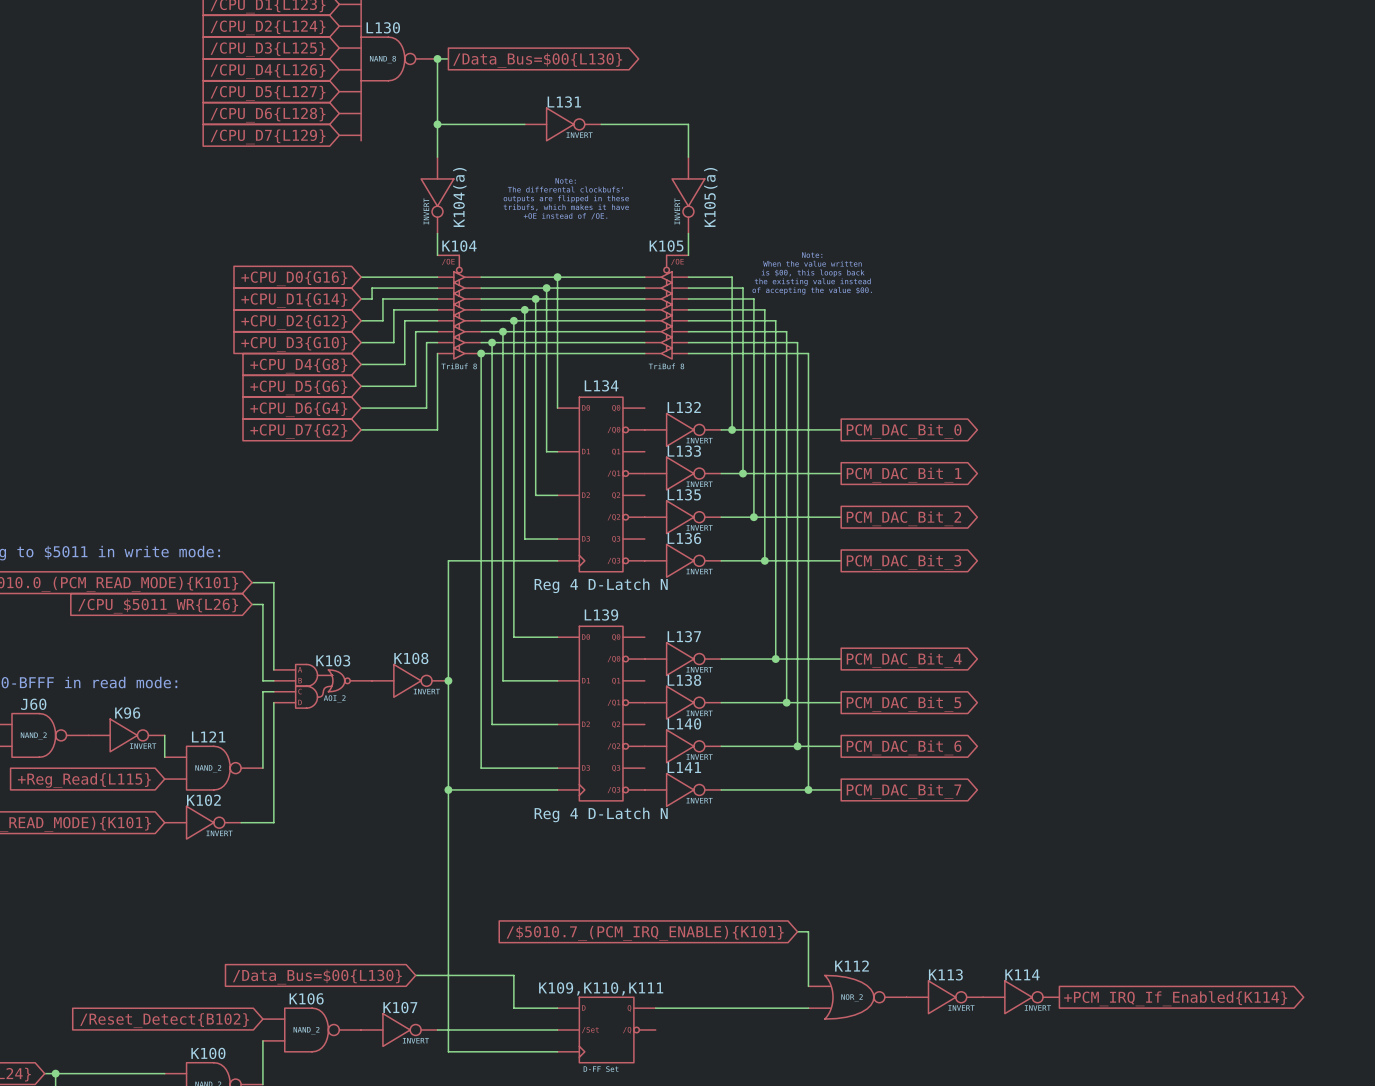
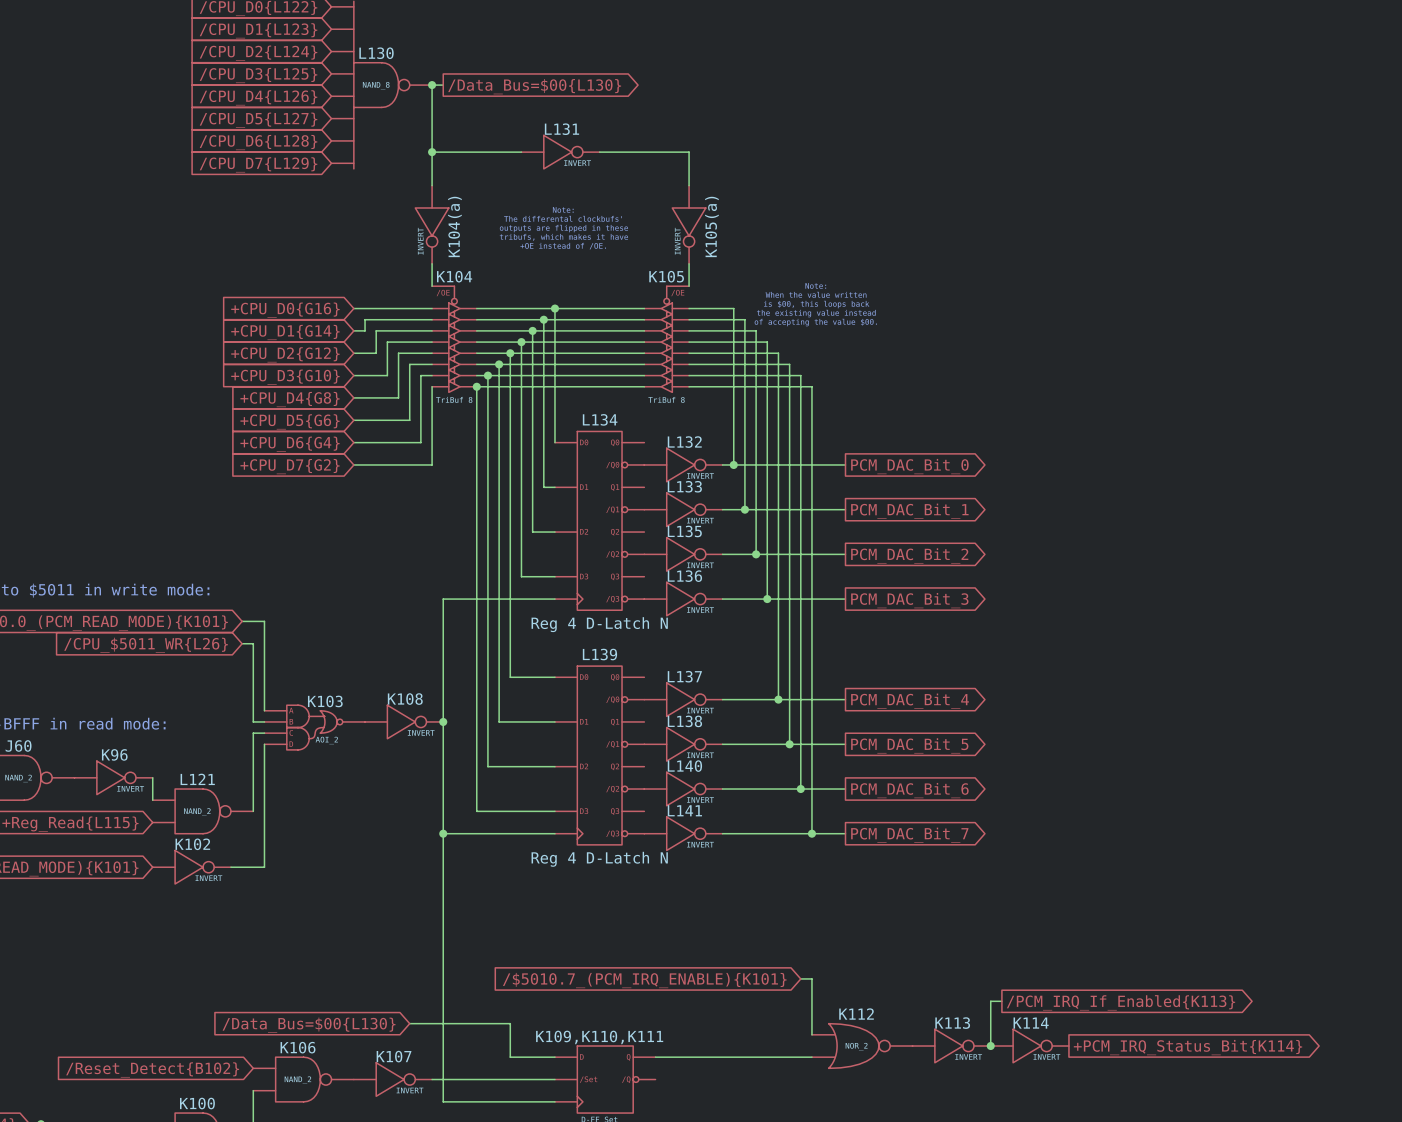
wire: none -> (1001, 1001) (990, 1001) (990, 1046)
global label: none -> /PCM_IRQ_If_Enabled{K113} (1121, 1002)
junction: none -> (990, 1046)
global label: +PCM_IRQ_If_Enabled{K114} (1175, 998) -> +PCM_IRQ_Status_Bit{K114} (1187, 1047)

